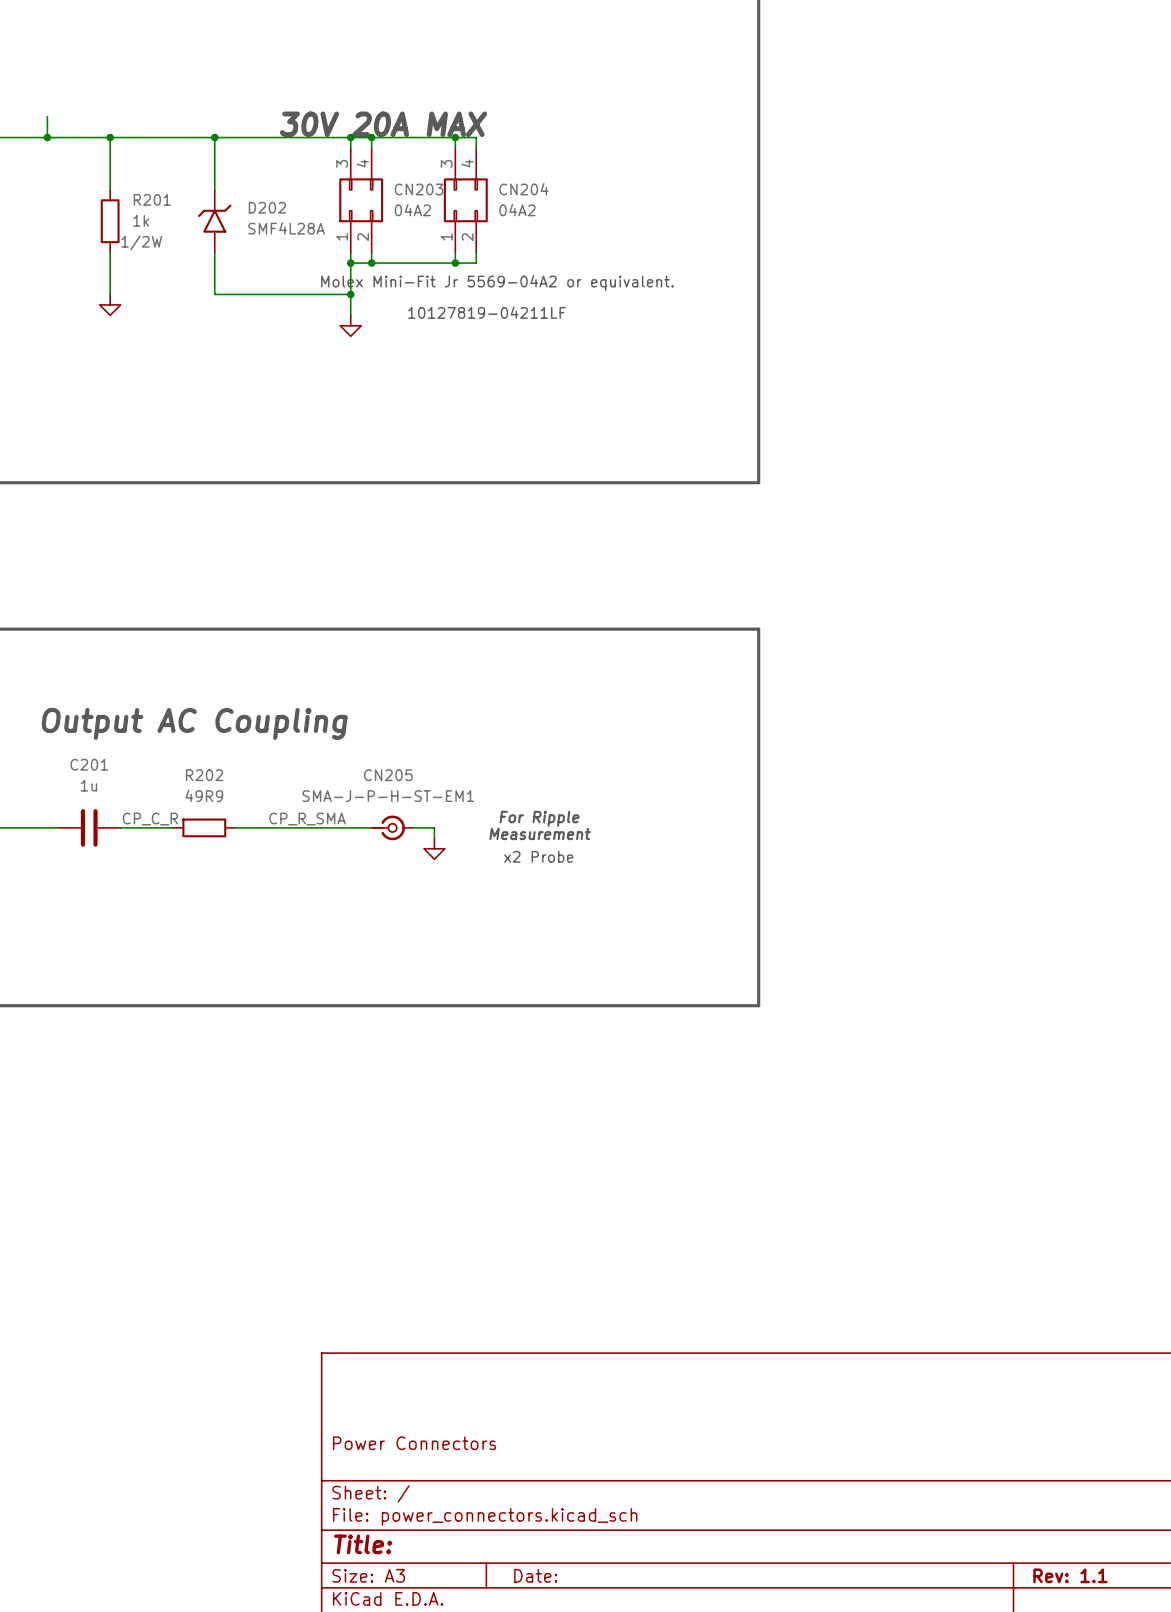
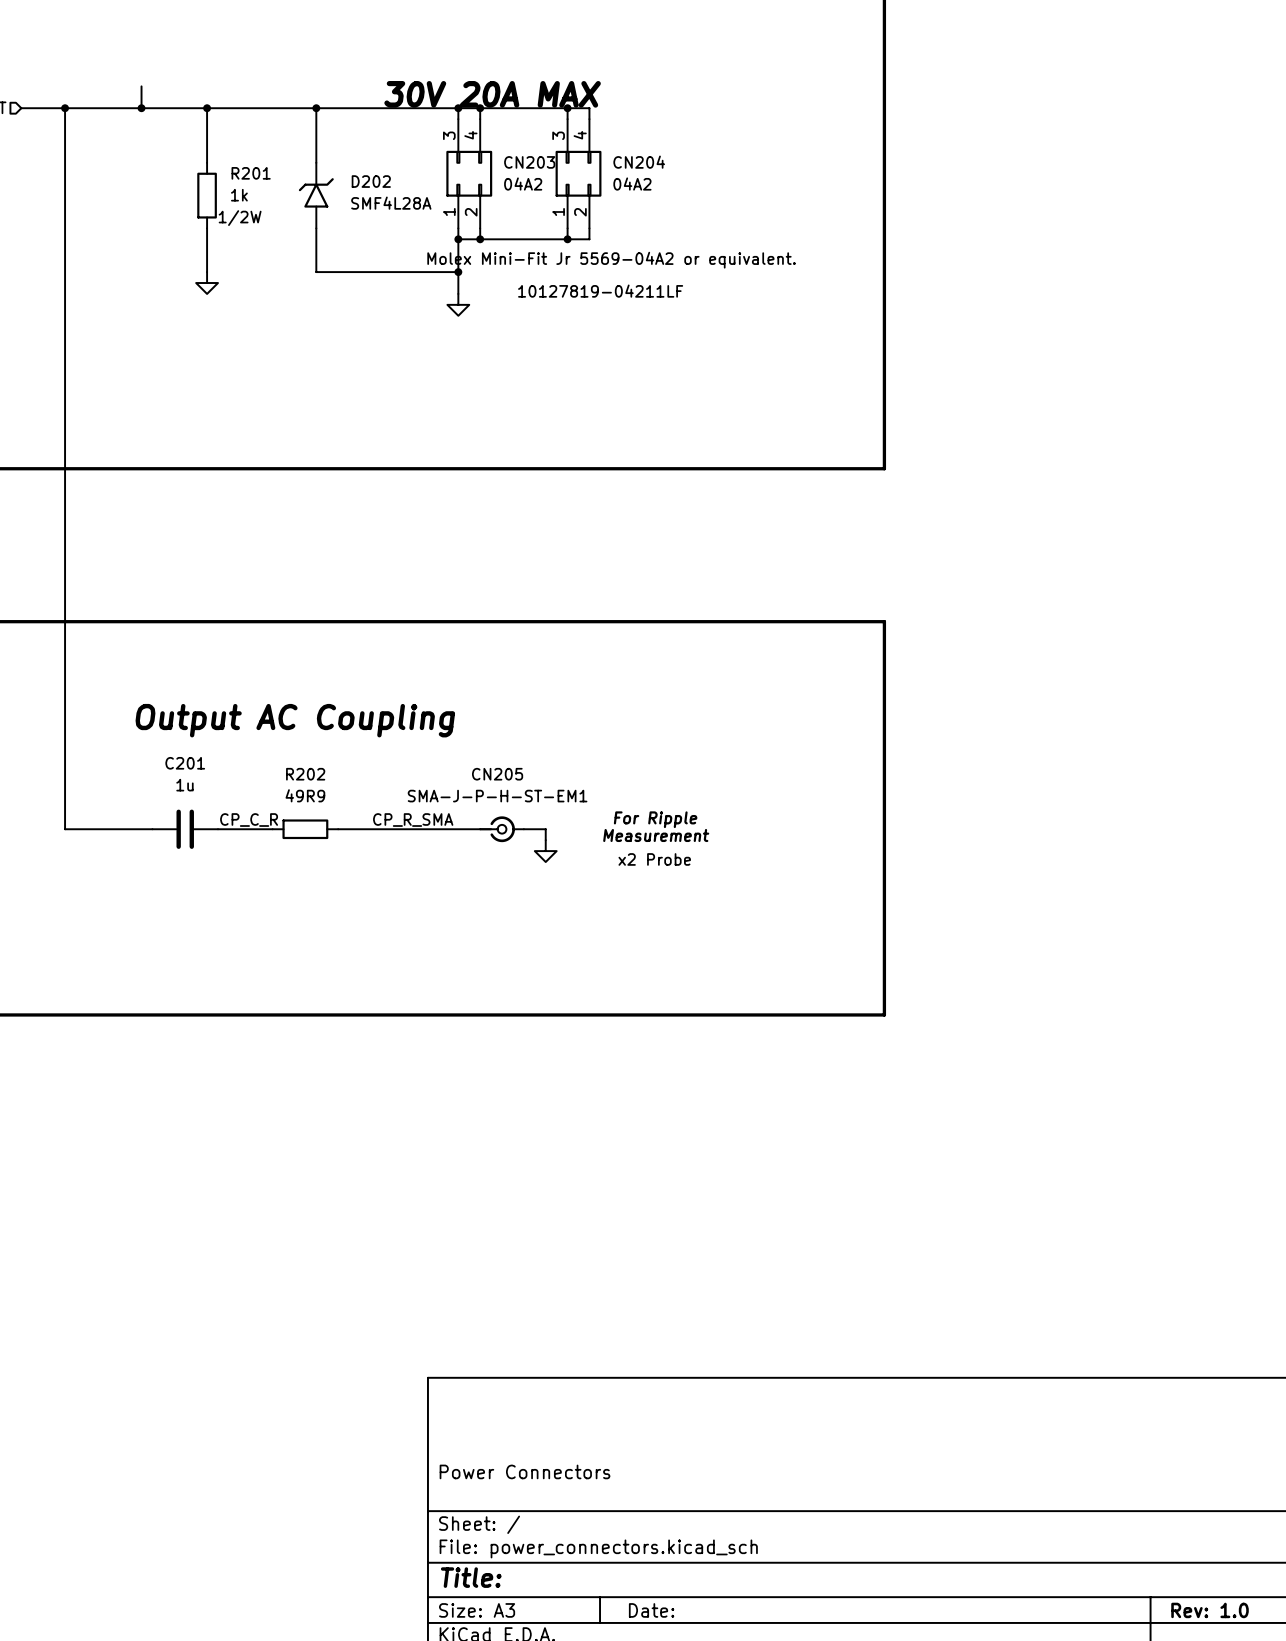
title block: Rev: 1.1 (1070, 1575) -> Rev: 1.0 (1210, 1610)

